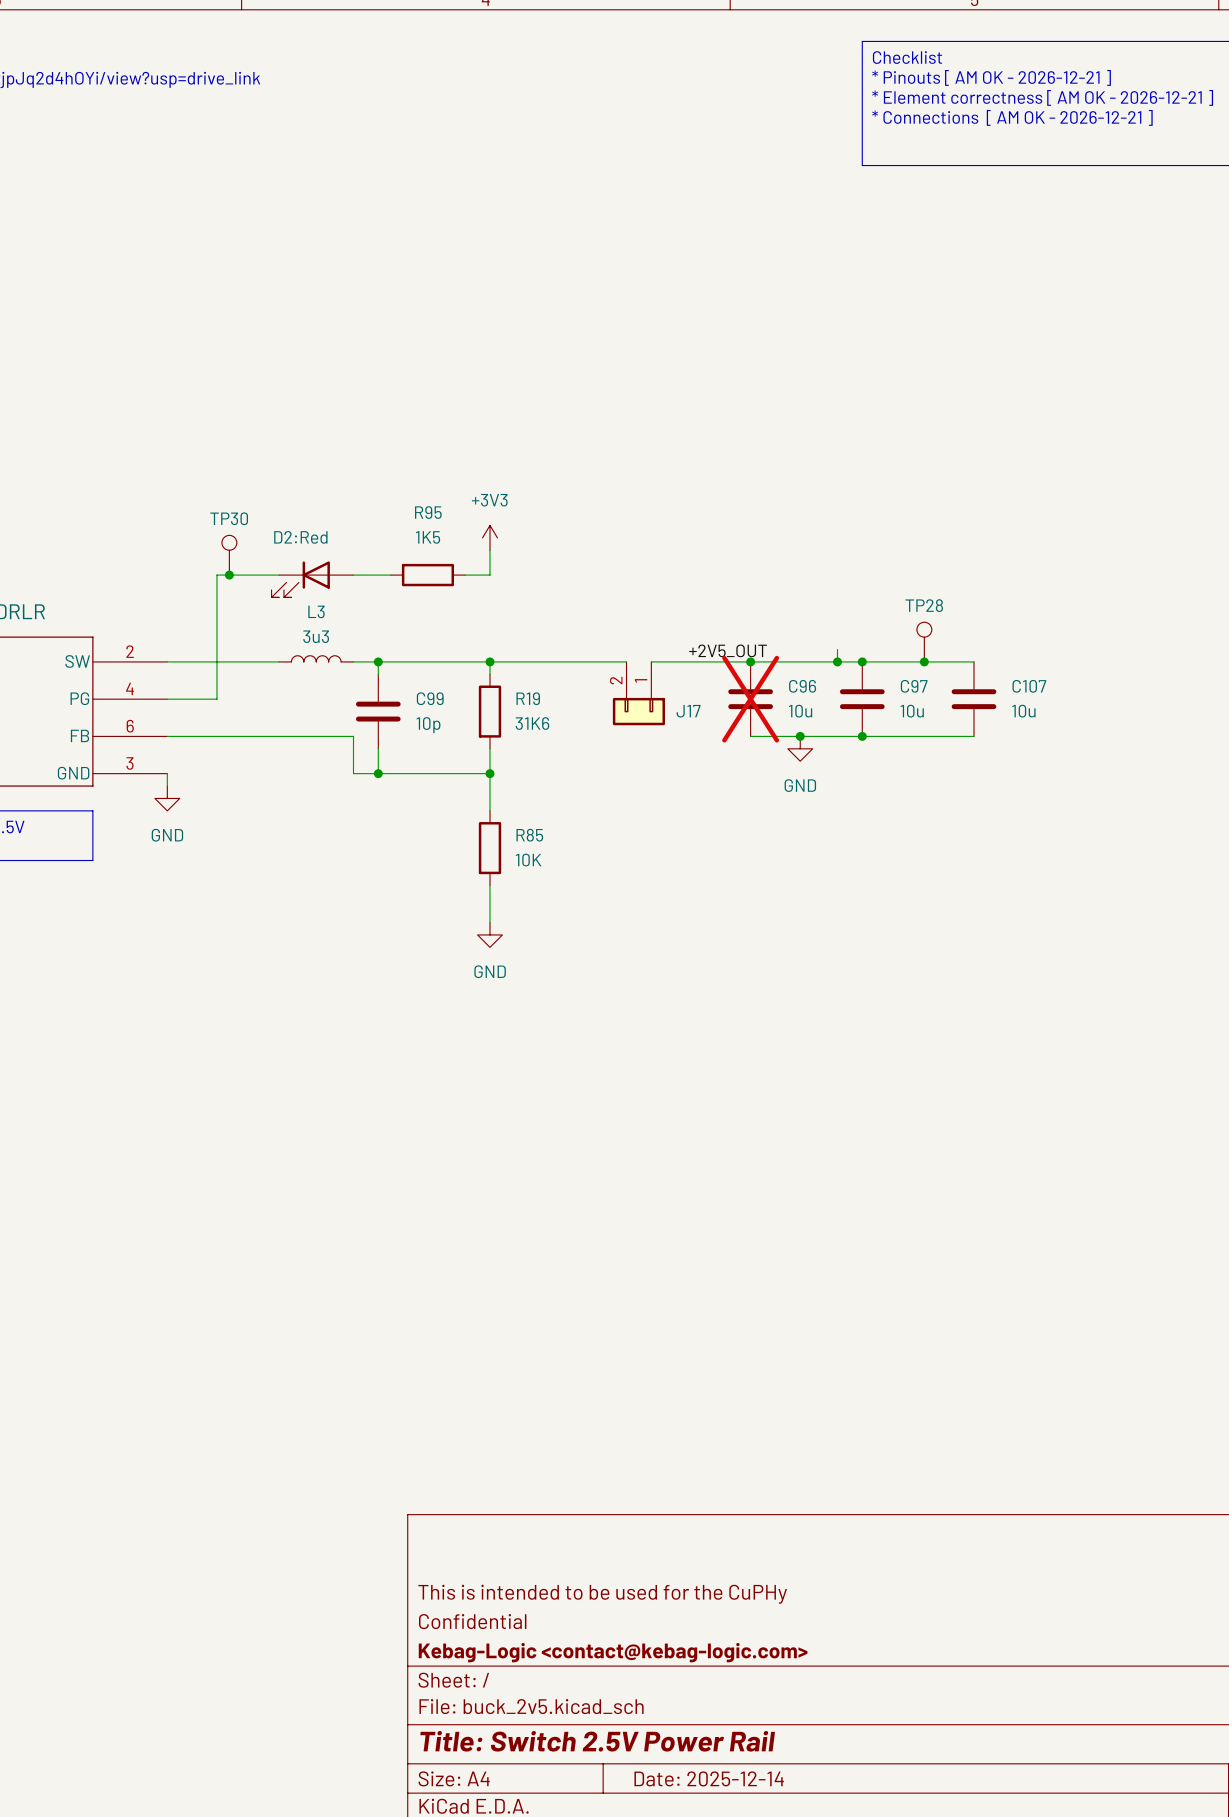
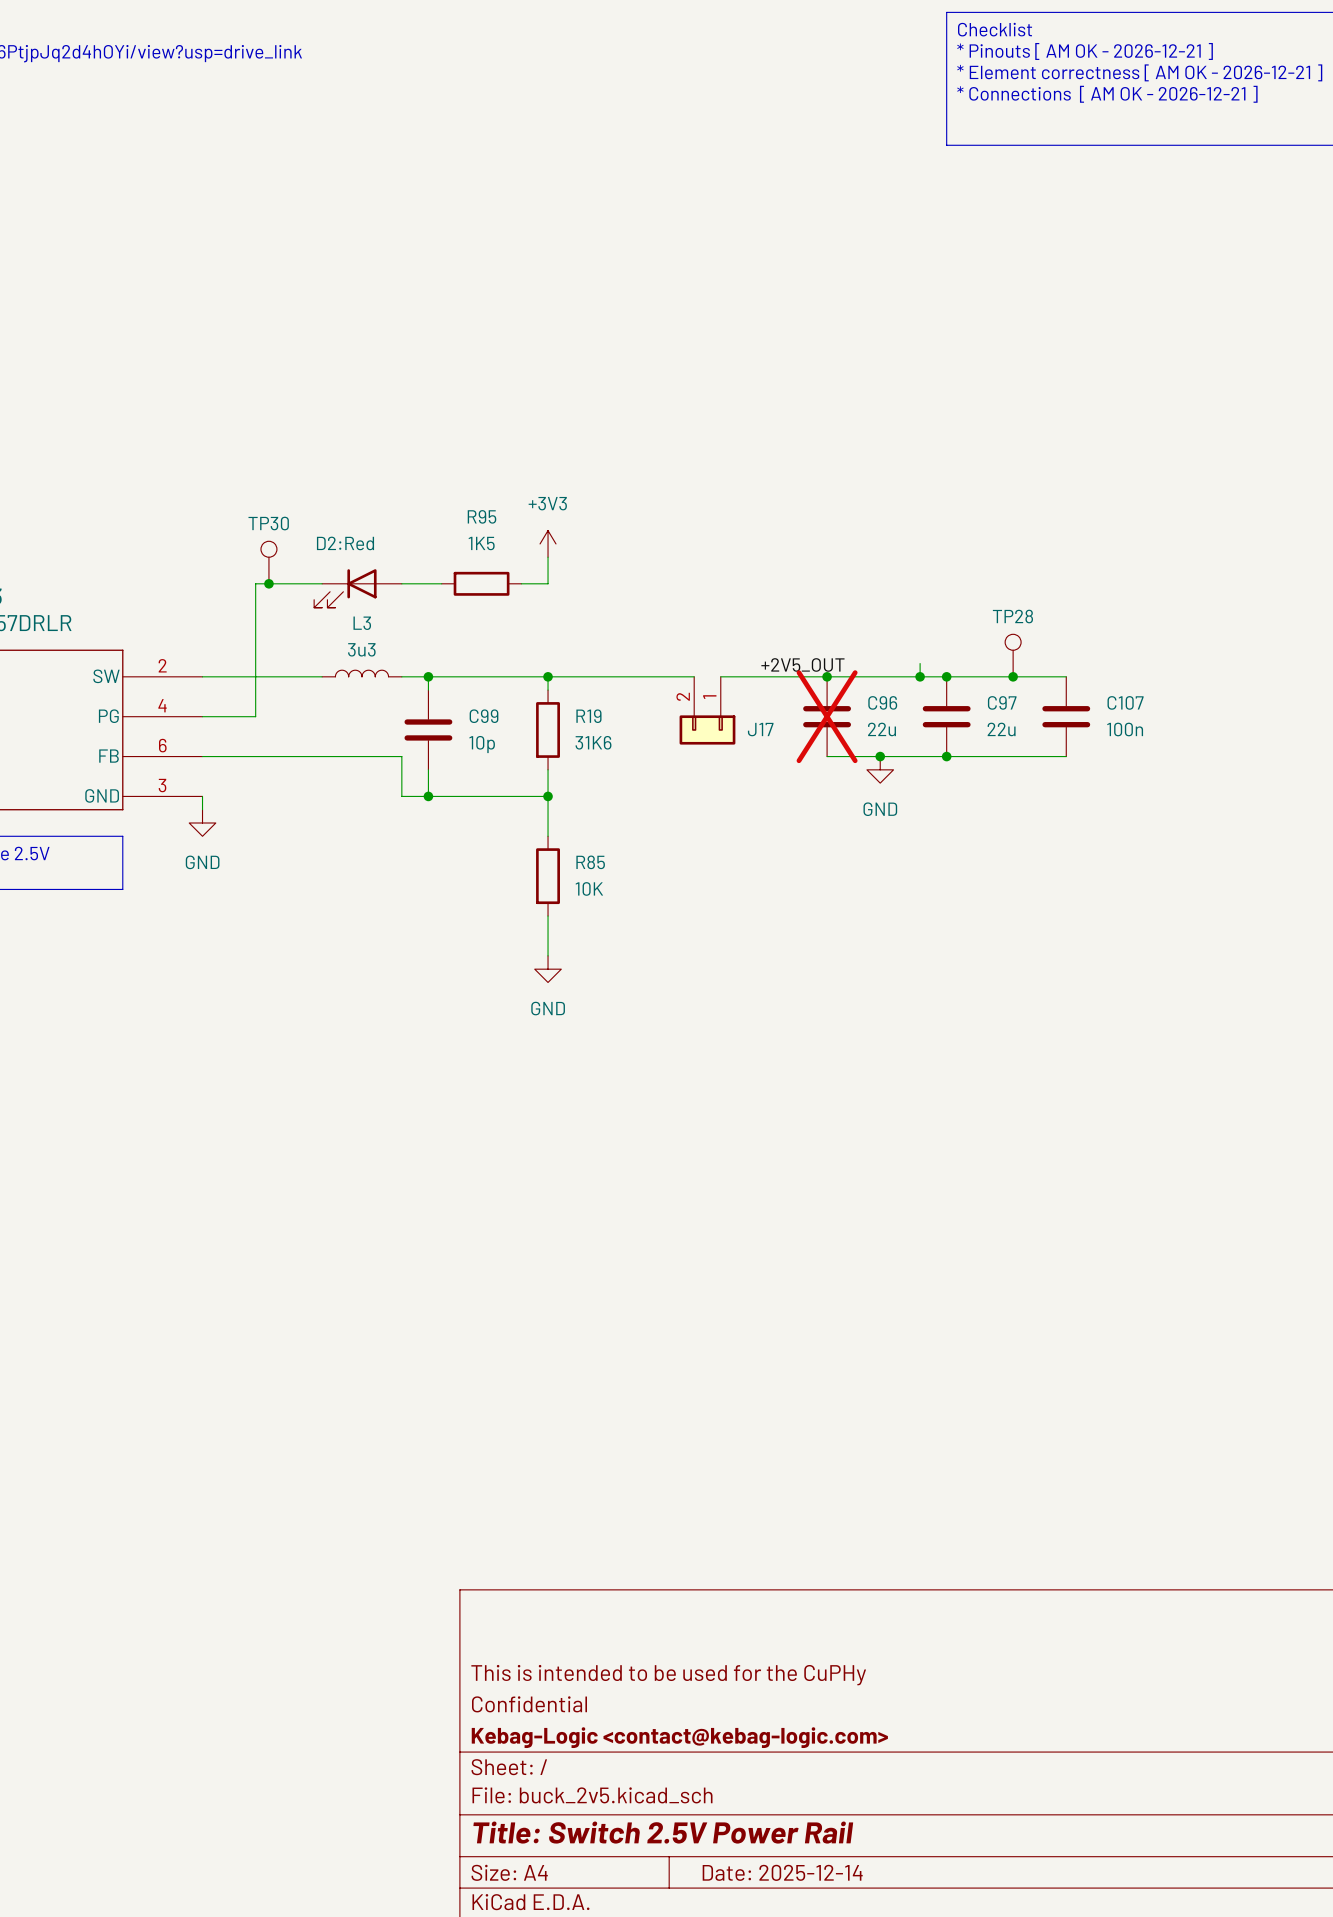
C96 value: 10u (800, 711) -> 22u (882, 729)
C97 value: 10u (912, 711) -> 22u (1001, 729)
C107 value: 10u (1023, 711) -> 100n (1125, 729)

